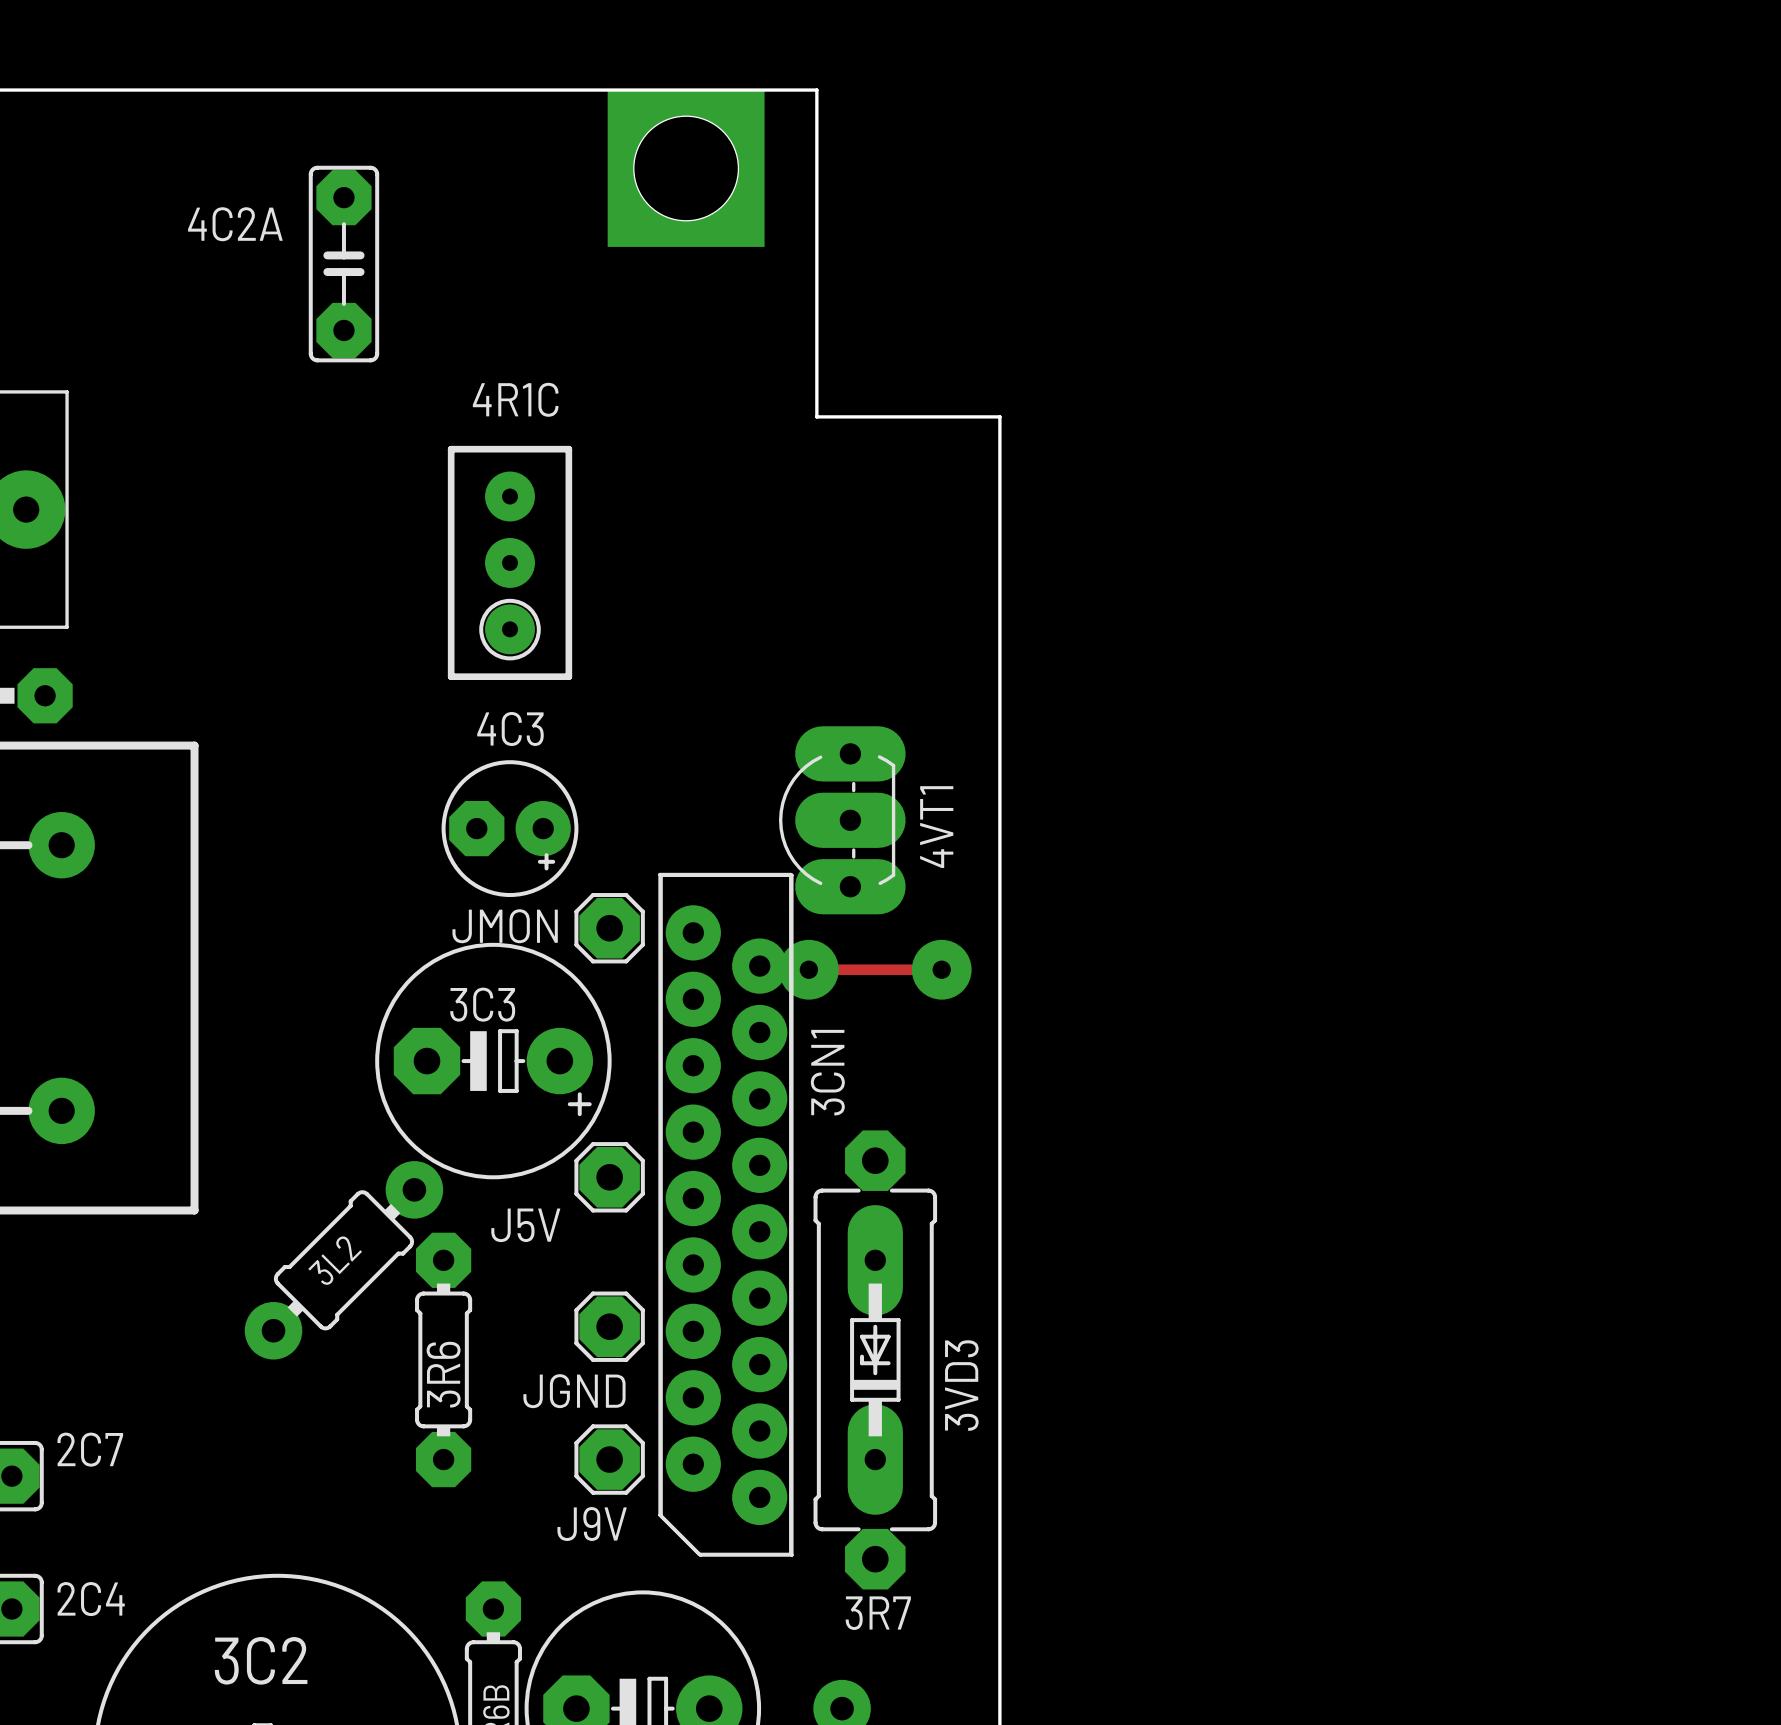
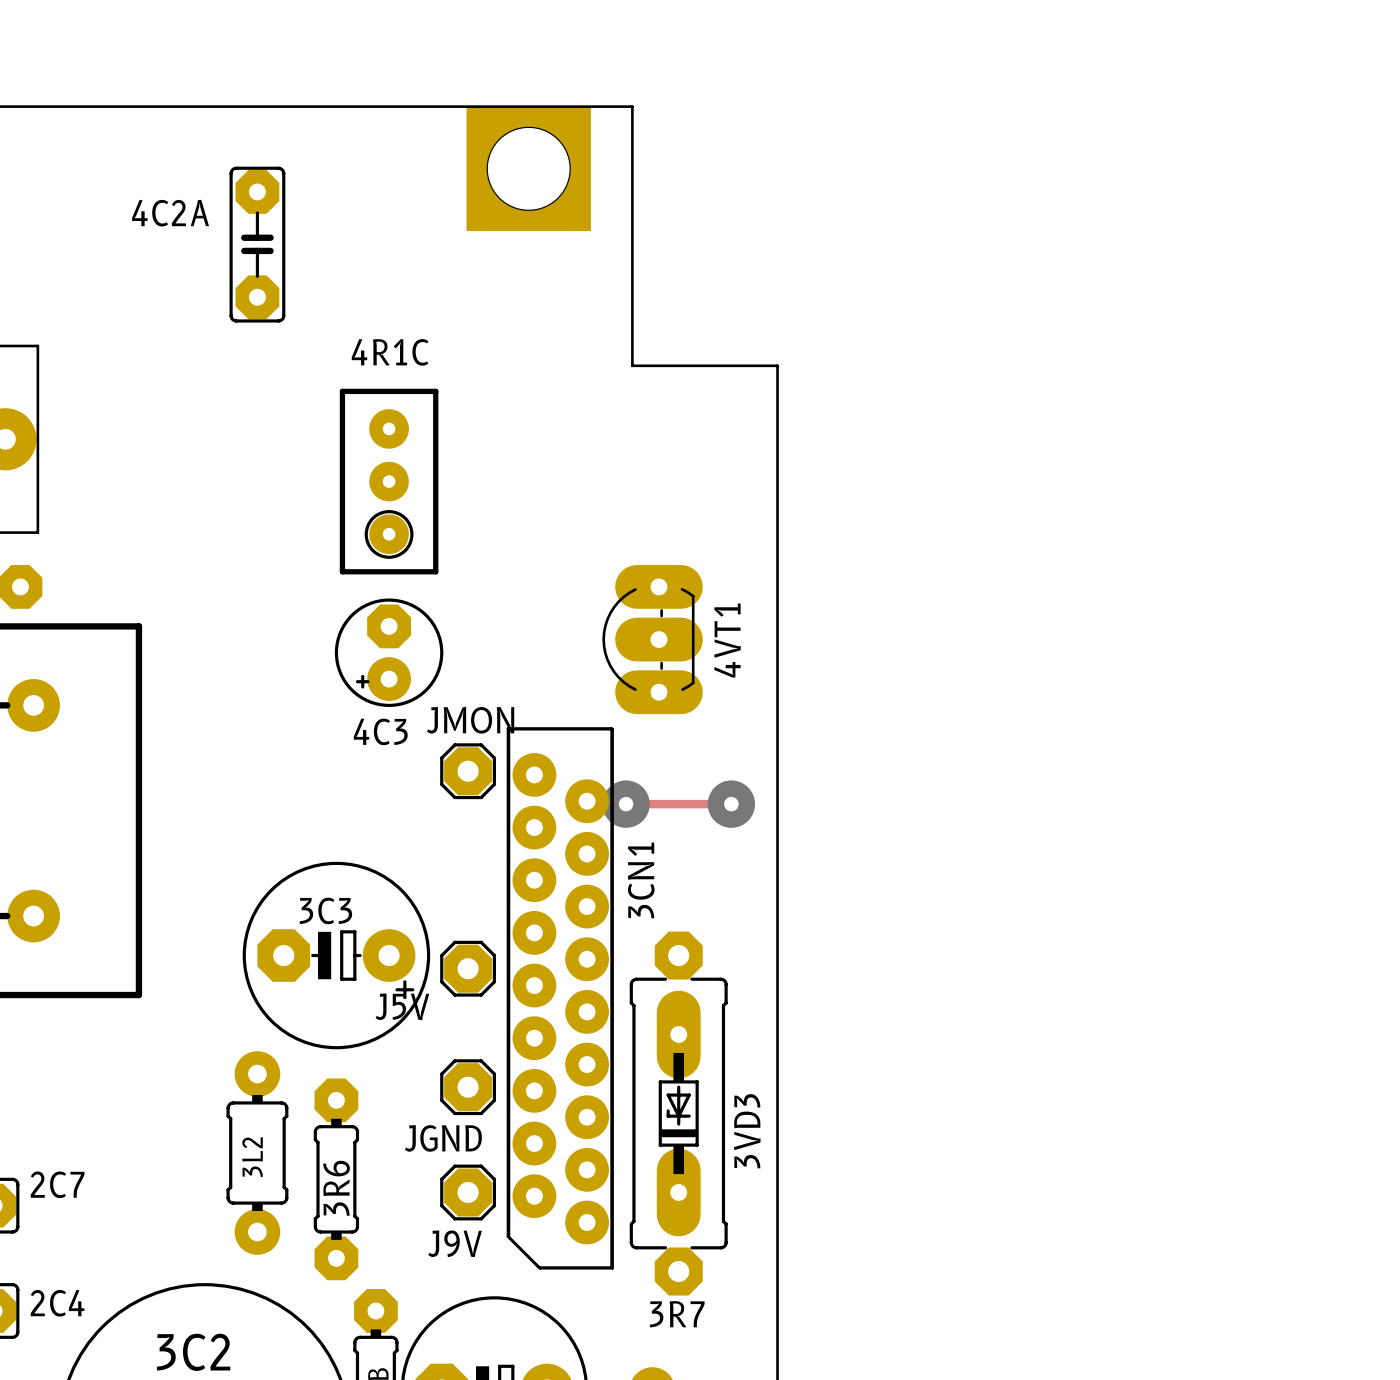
4C3 name position: 4C3 (510, 729) -> 4C3 (380, 731)
4VT1 position: (842, 820) -> (652, 639)
4C3 rotation: 0° (510, 828) -> 90° clockwise (389, 652)
JMON name position: JMON (505, 926) -> JMON (470, 720)
3C3 position: (493, 1061) -> (336, 955)
3L2 rotation: 0° (343, 1260) -> 45° counterclockwise (257, 1153)
3L2 position: (343, 1260) -> (257, 1153)
3R6 position: (443, 1359) -> (336, 1179)

